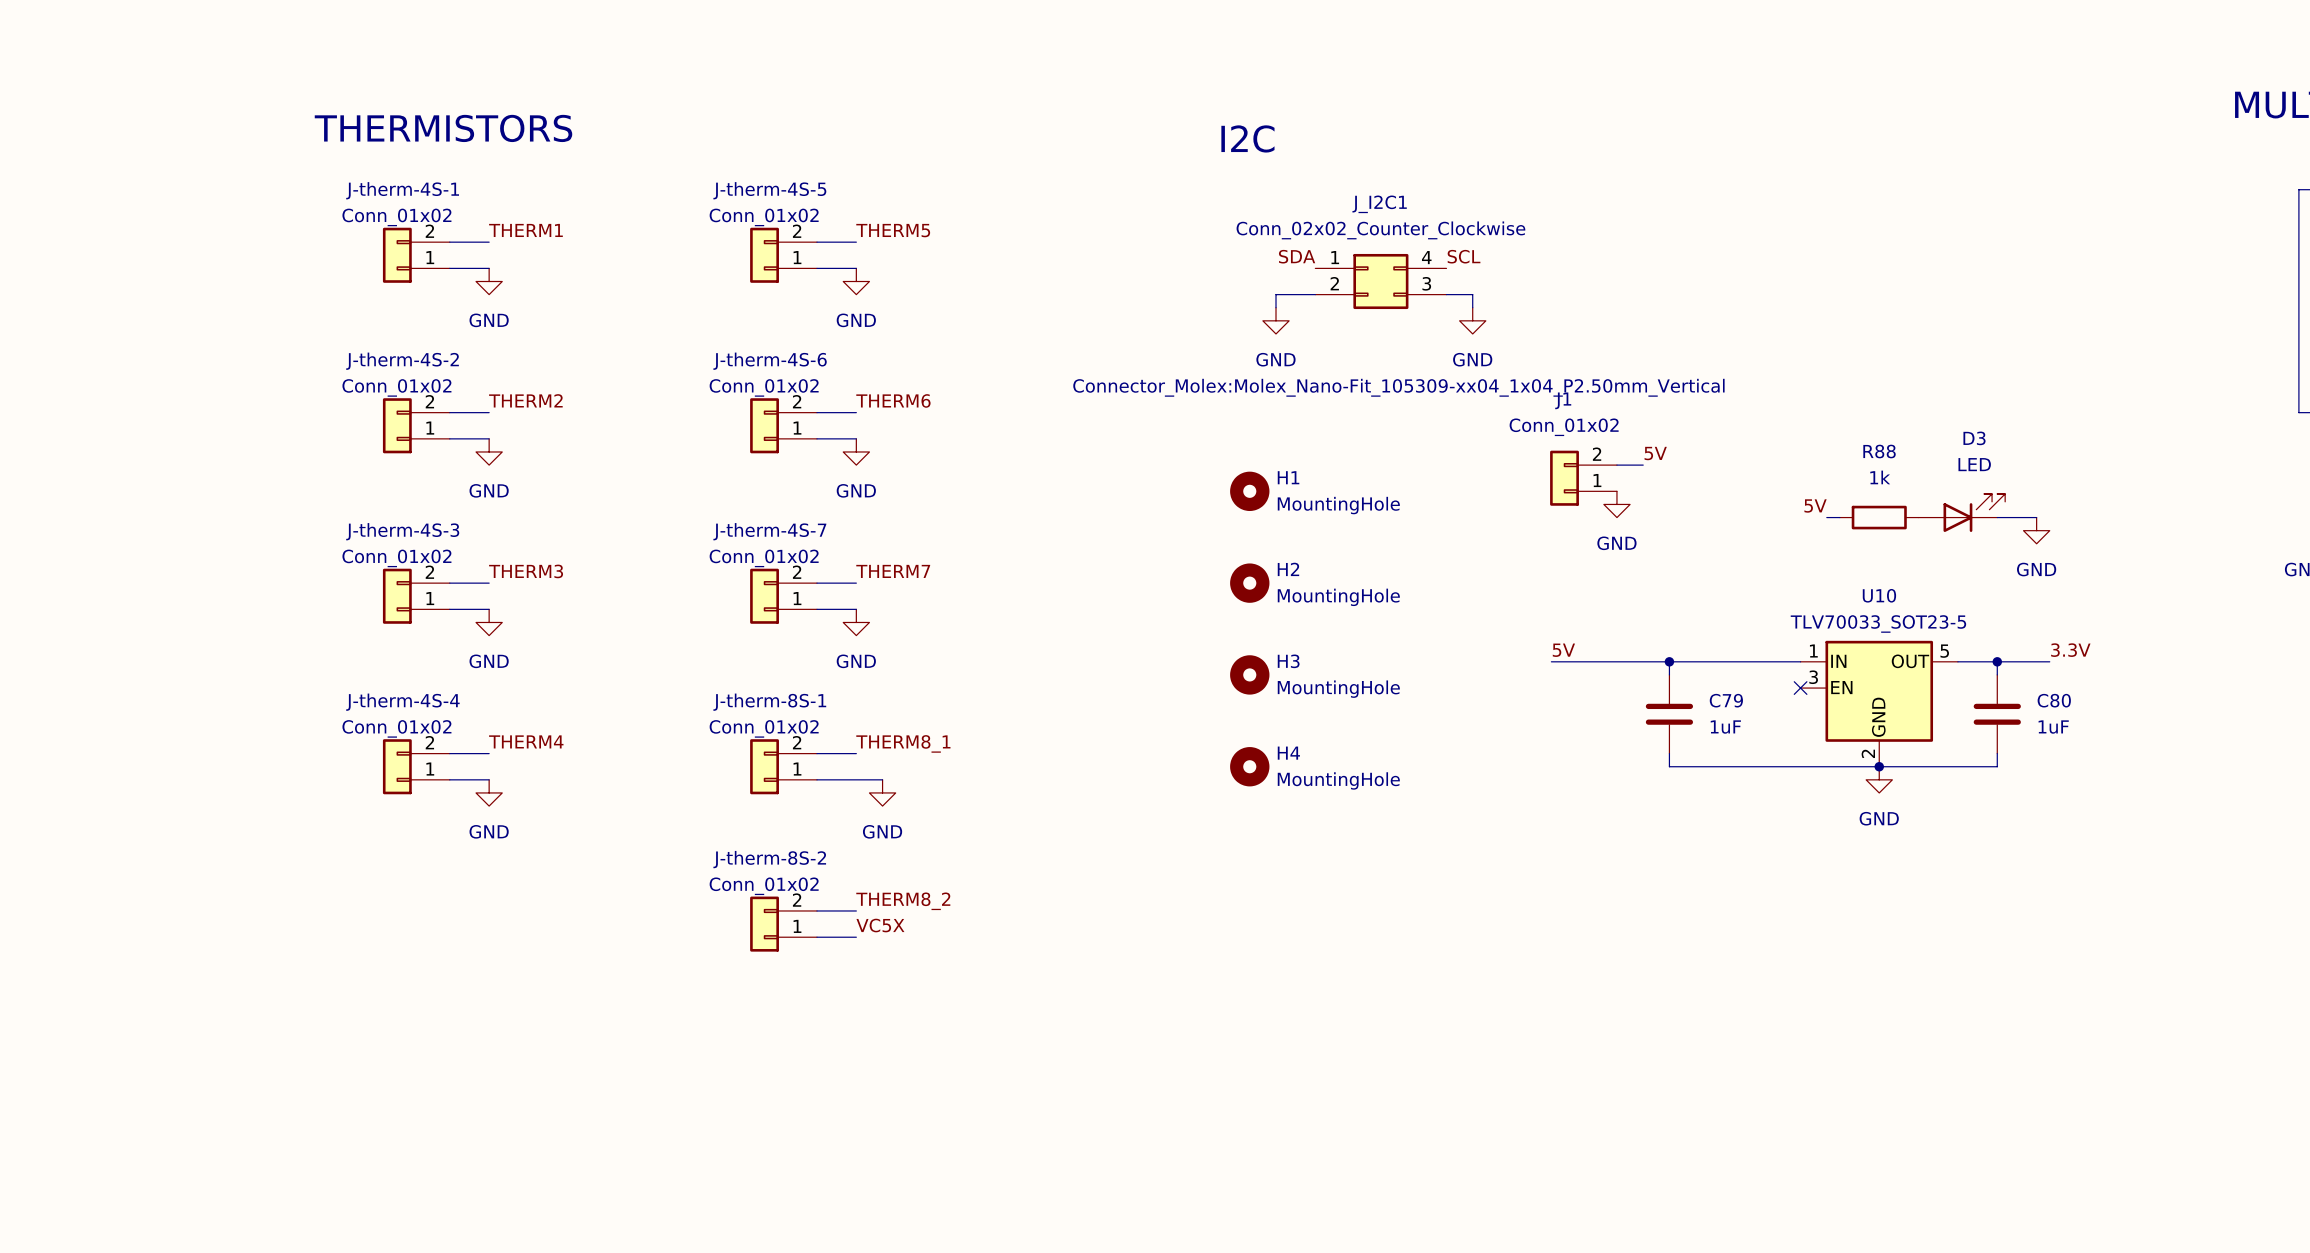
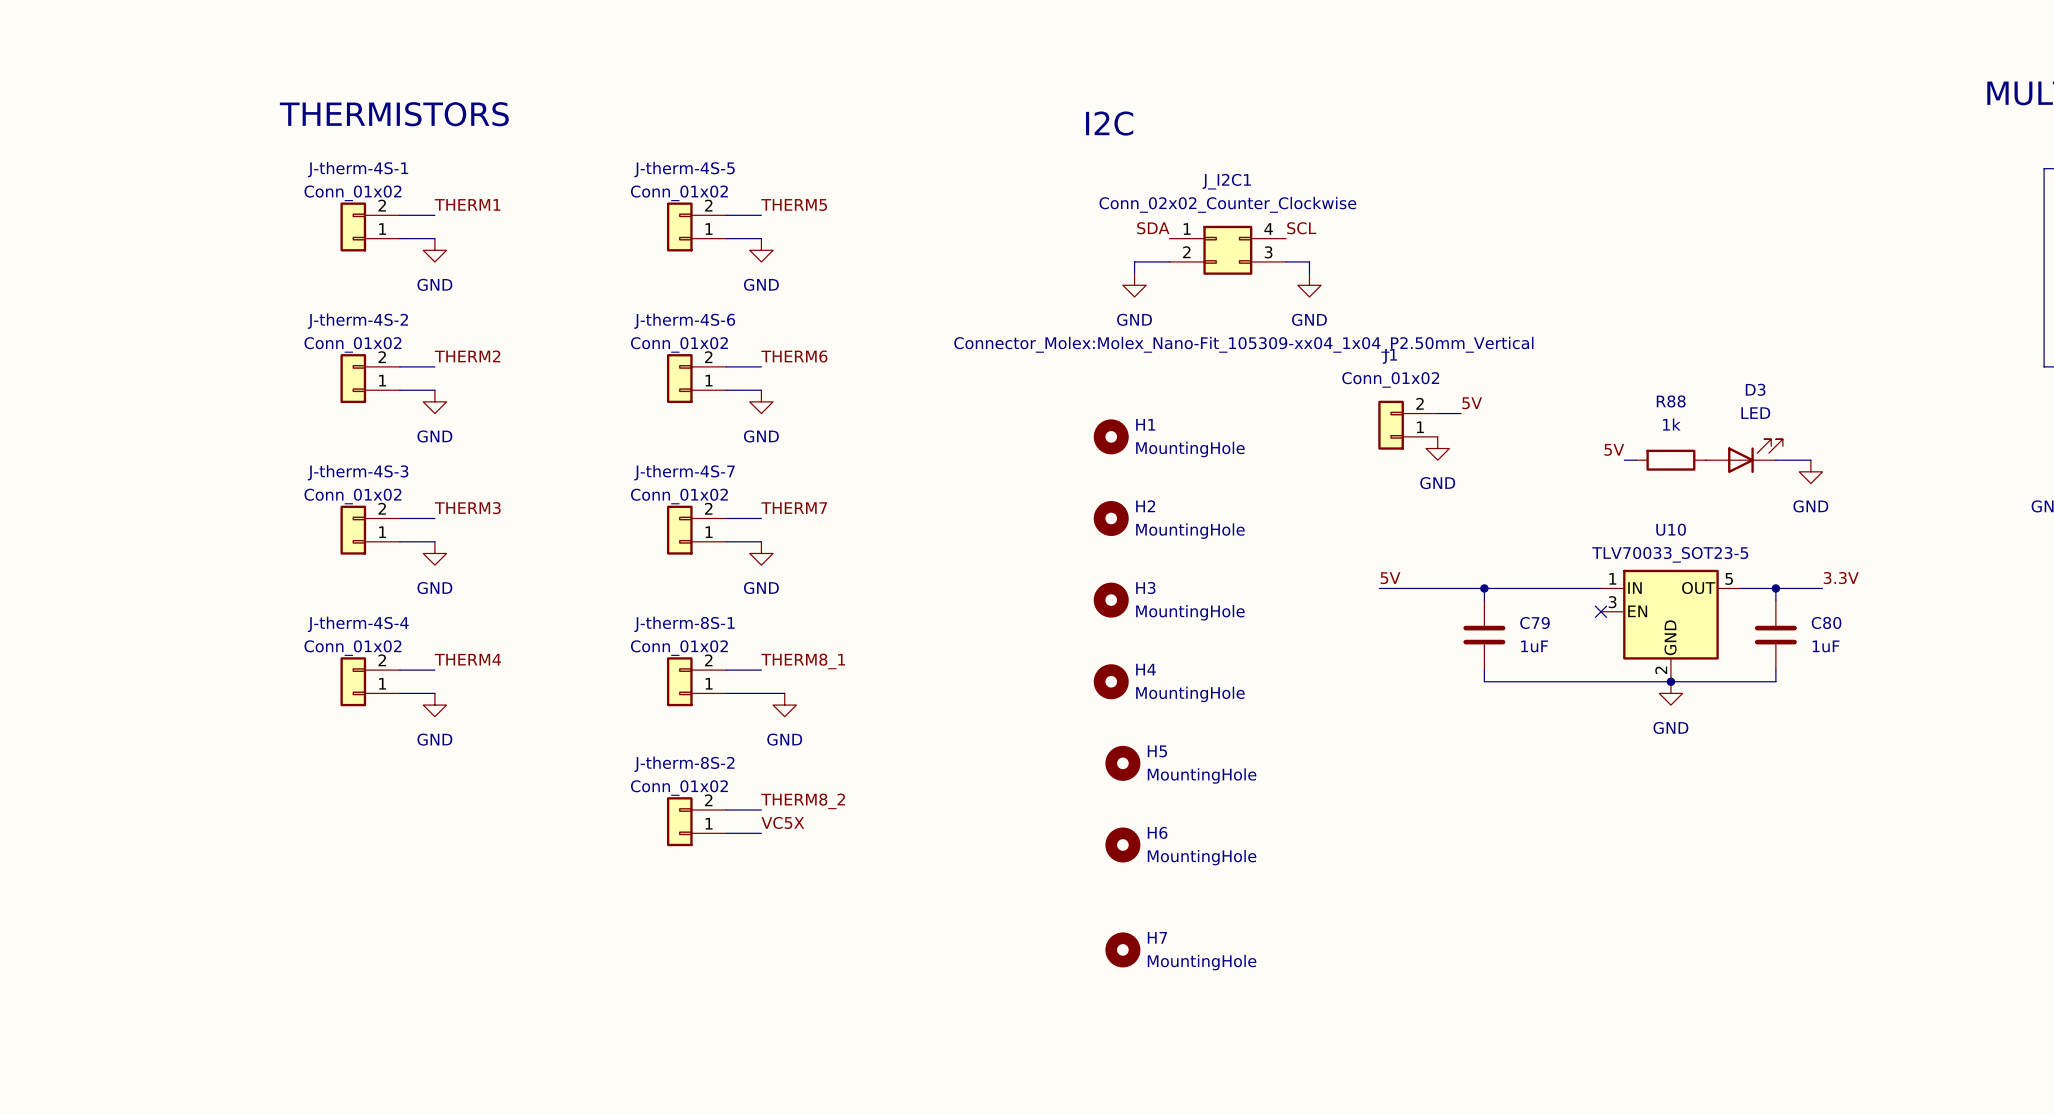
H5: none -> MountingHole (1122, 763)
H6: none -> MountingHole (1122, 844)
H7: none -> MountingHole (1122, 949)

